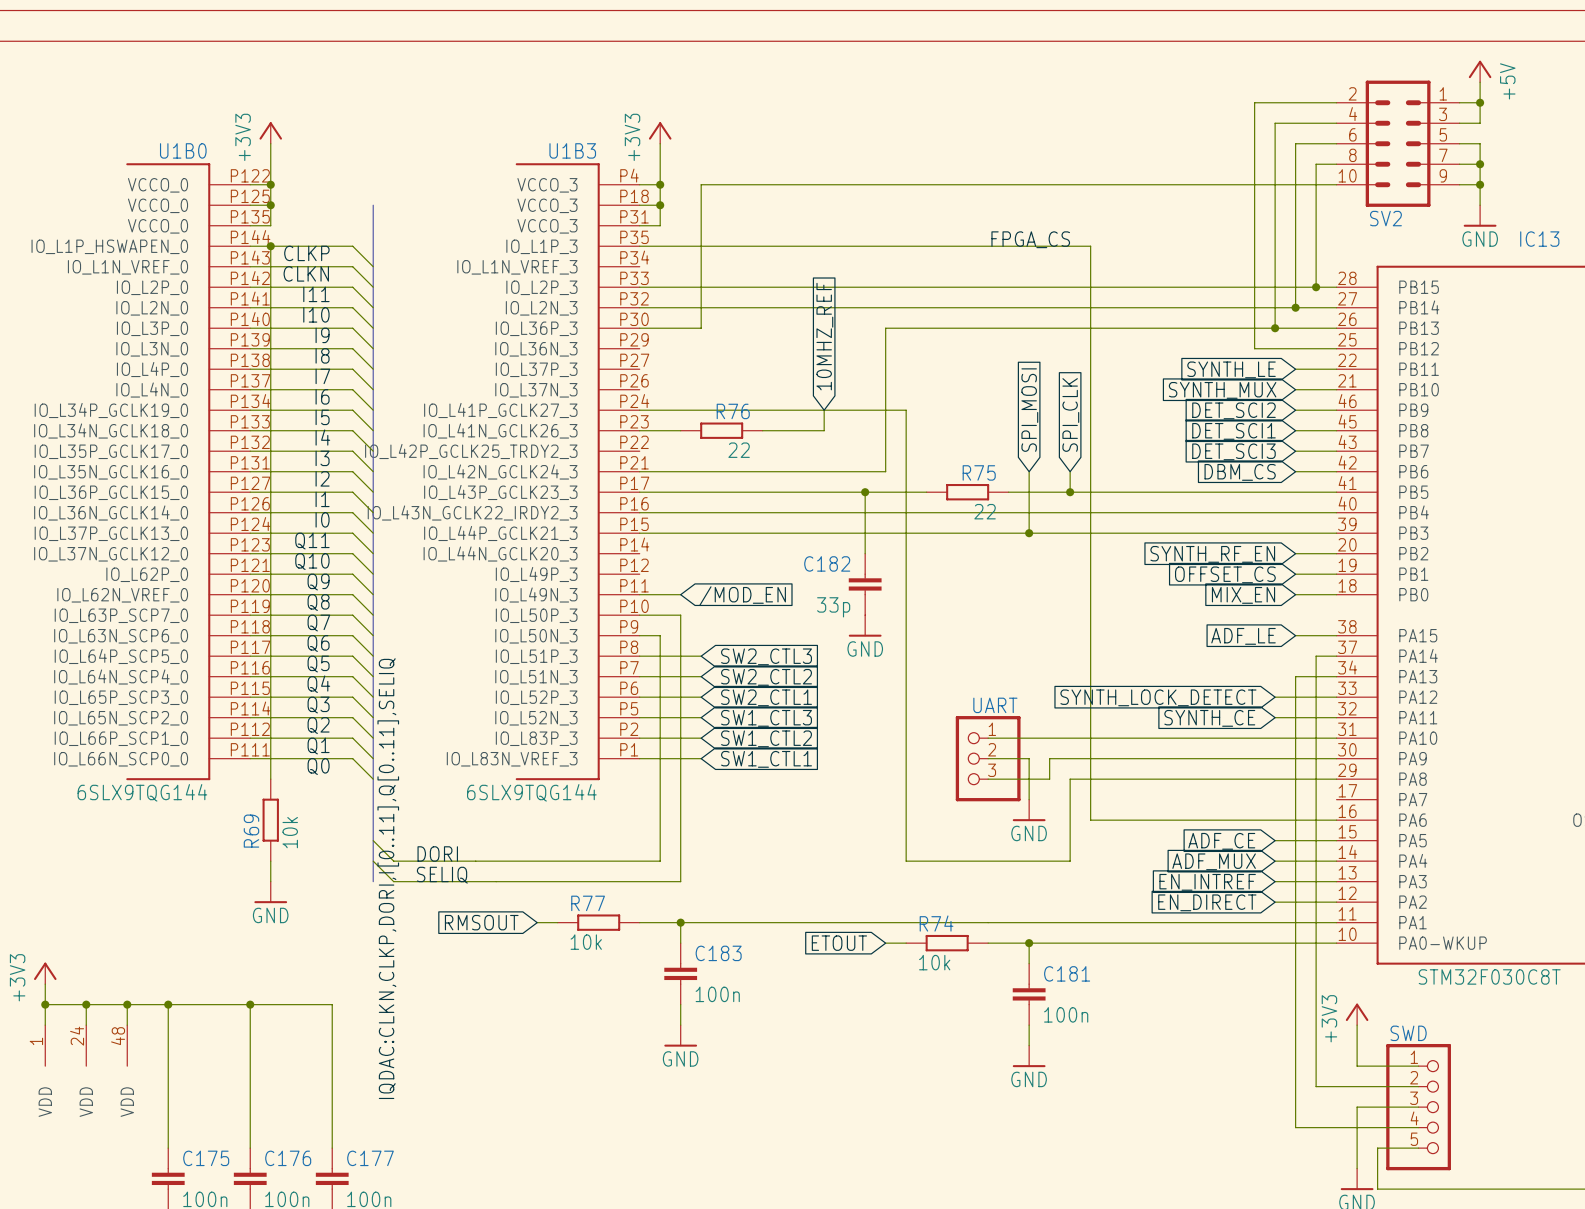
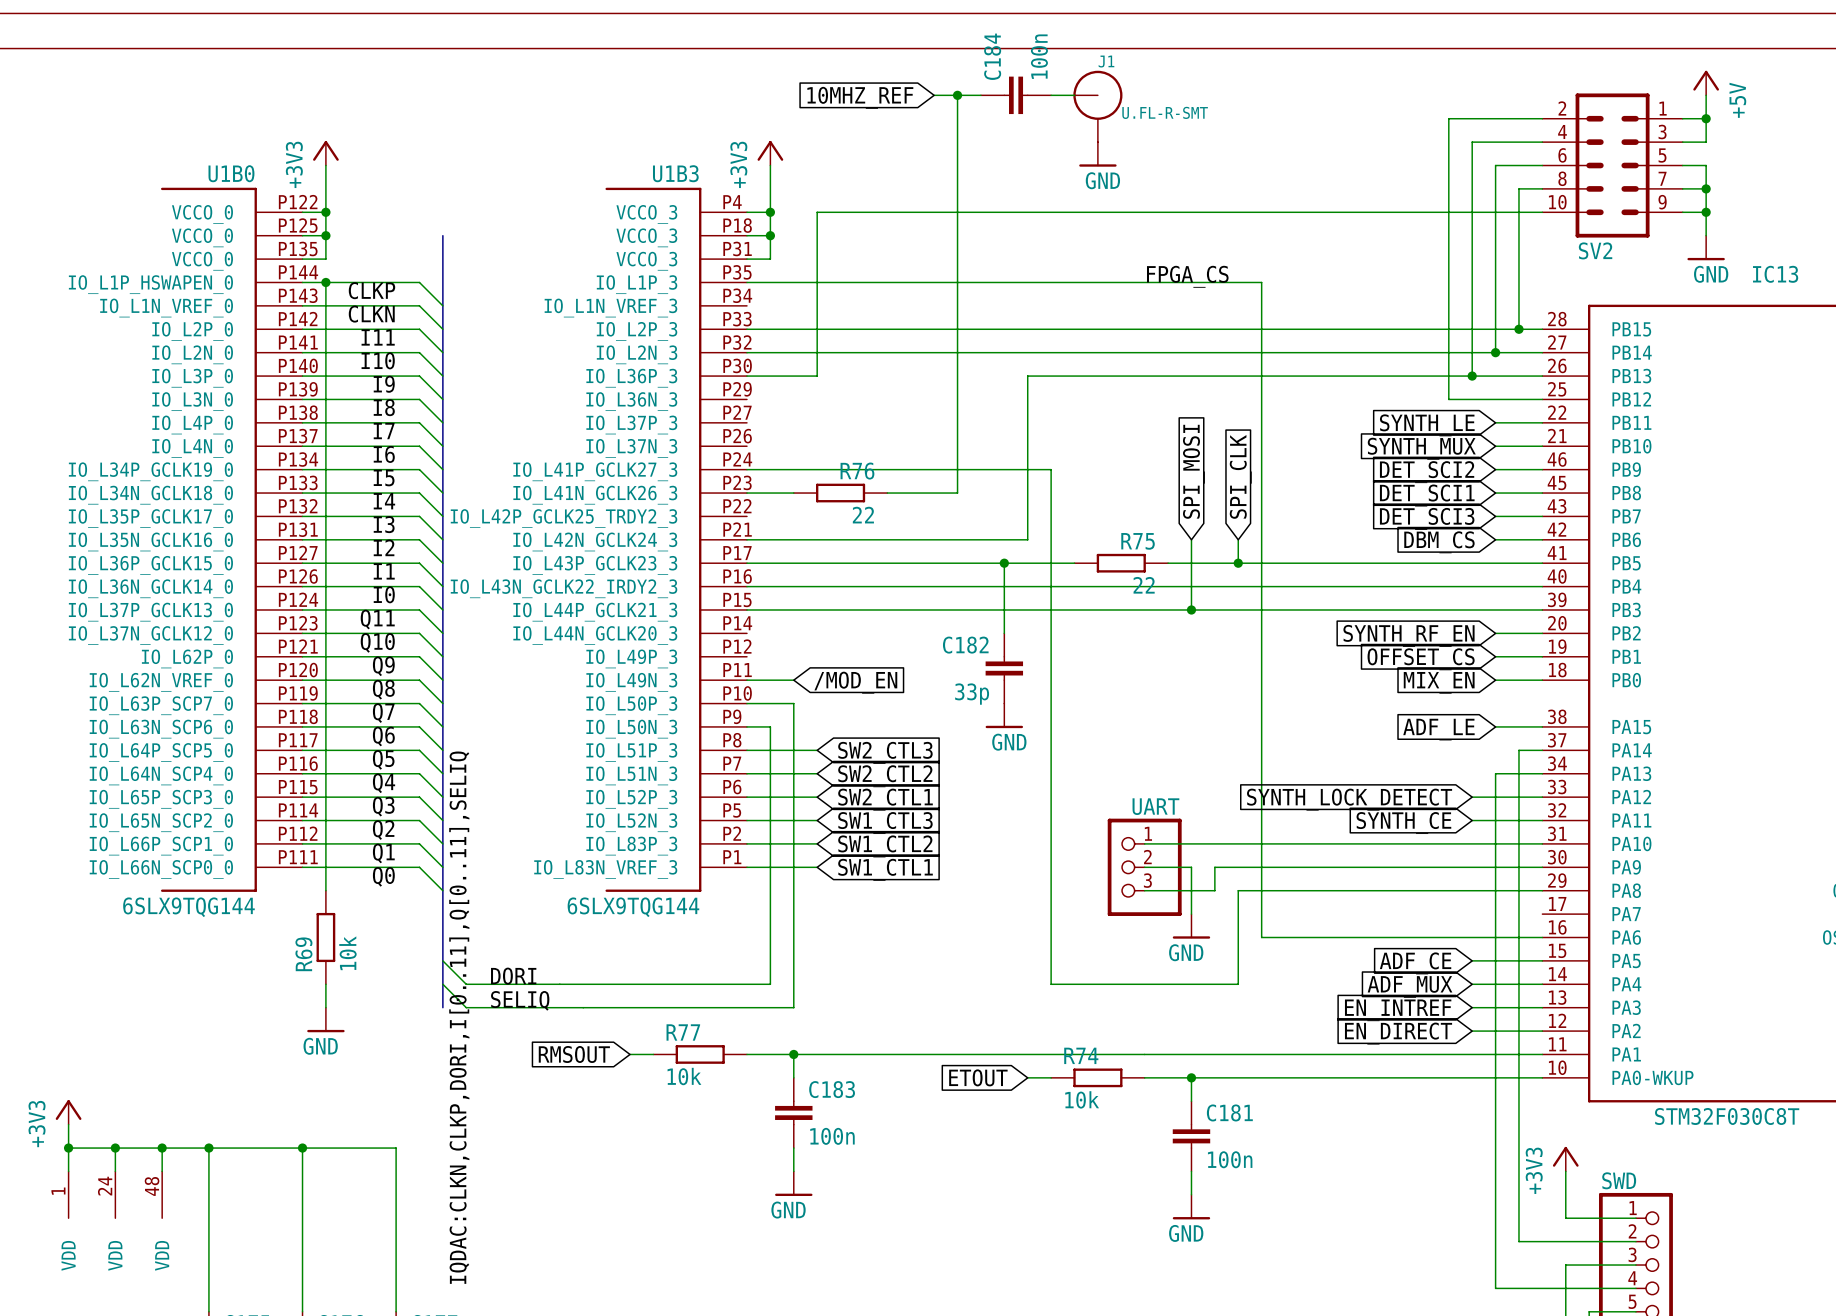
global label: none -> 10MHZ_REF (860, 97)
wire: none -> (934, 95) (980, 95)
wire: none -> (957, 95) (957, 469)
junction: none -> (957, 95)
C184: none -> 100n (1016, 95)
wire: none -> (1051, 95) (1074, 95)
J1: none -> U.FL-R-SMT (1097, 106)
power symbol: none -> GND (1097, 154)
global label: 10MHZ_REF (824, 336) -> none

